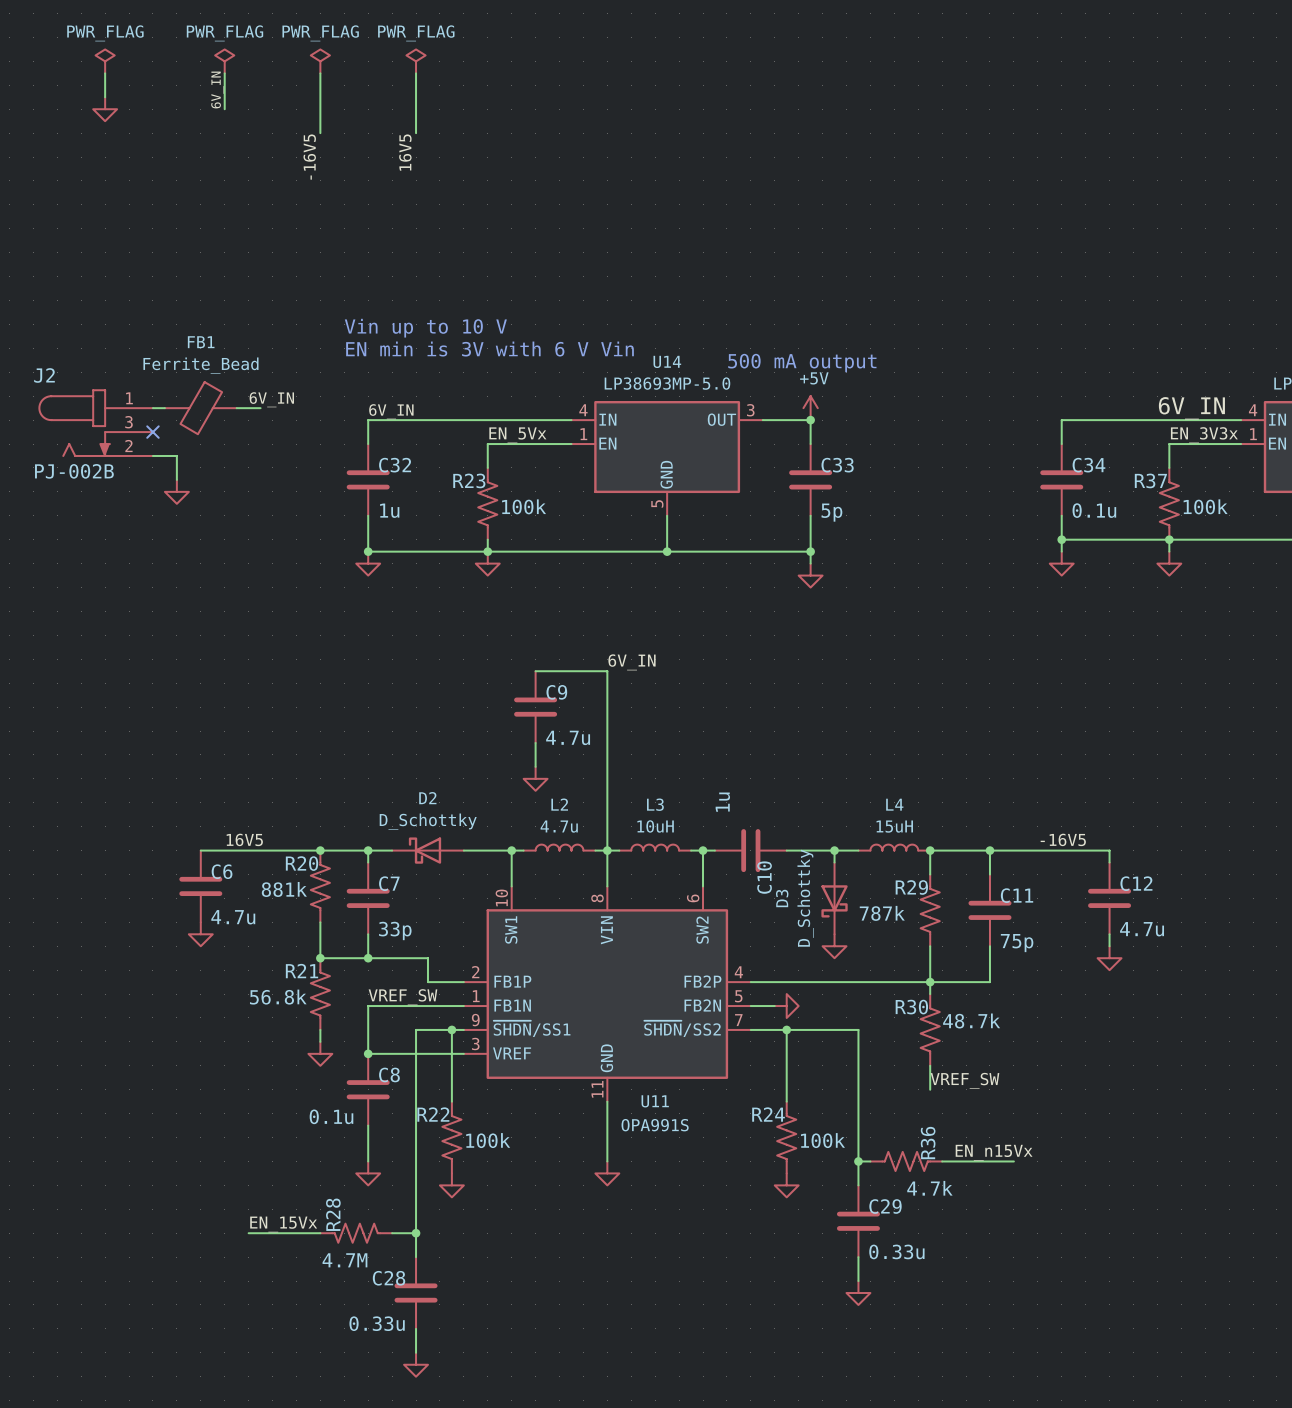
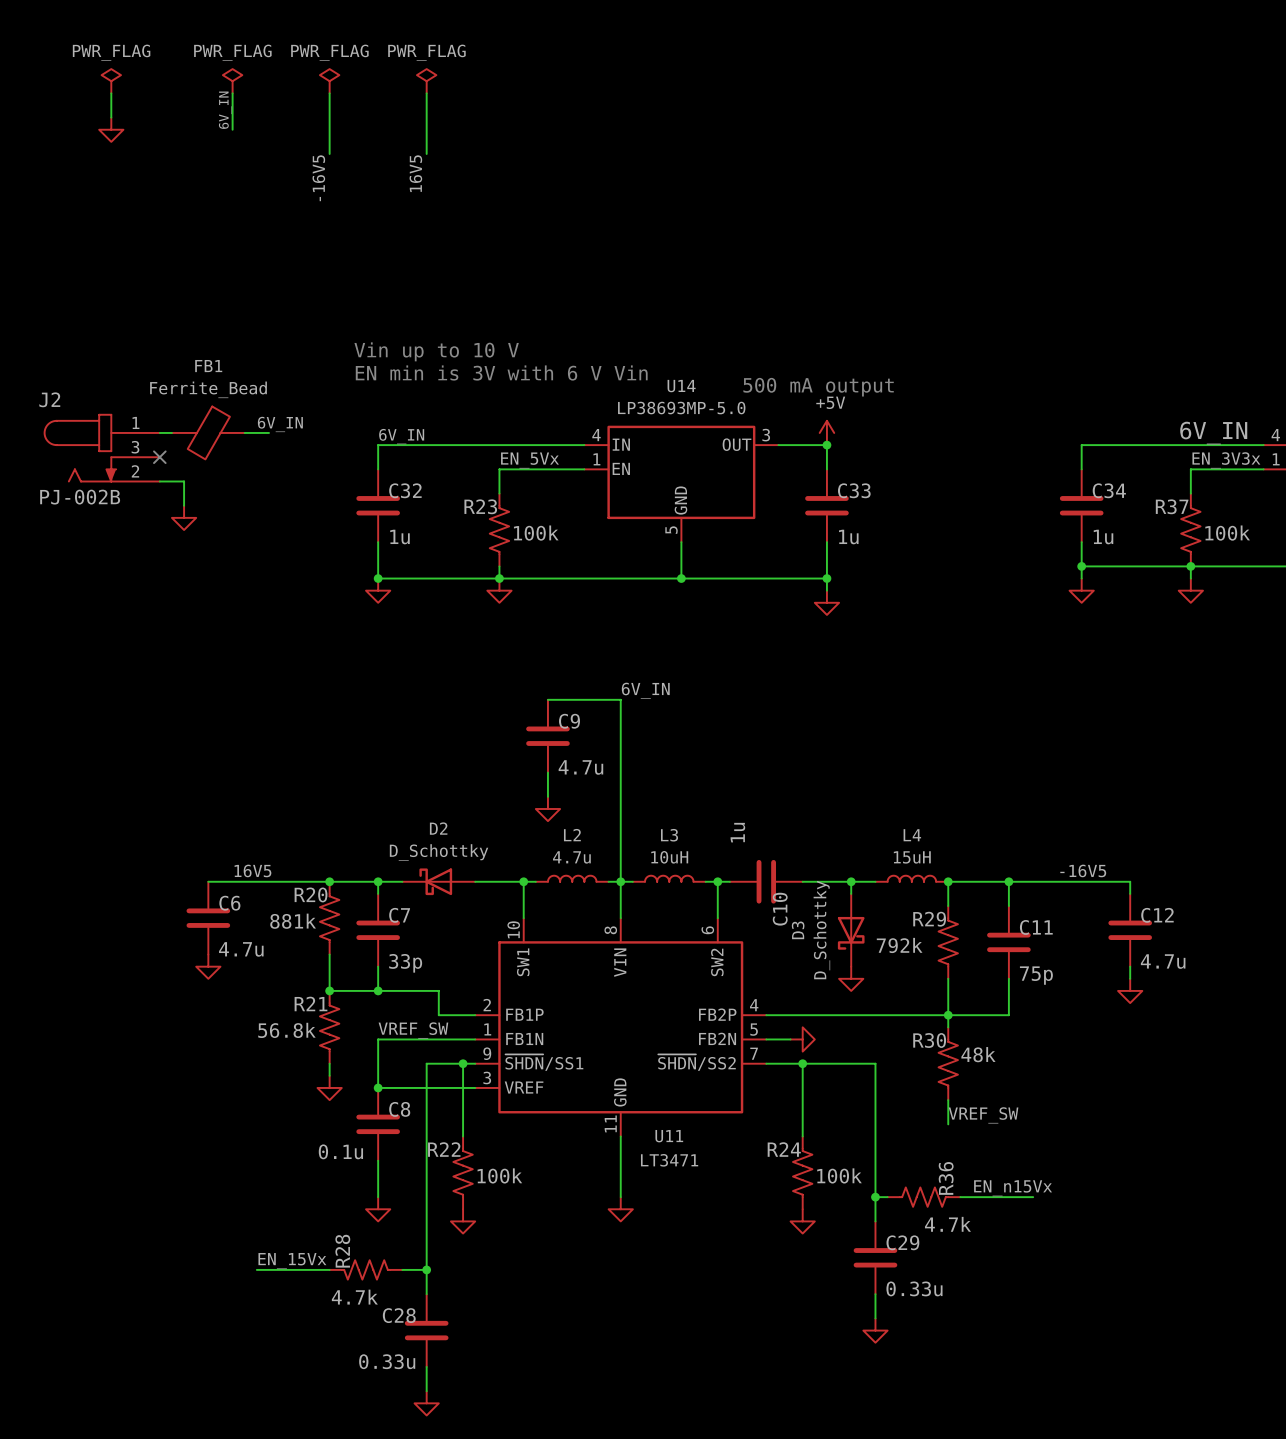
C34 value: 0.1u (1094, 510) -> 1u (1103, 537)
C33 value: 5p (831, 512) -> 1u (848, 537)
R29 value: 787k (882, 913) -> 792k (899, 945)
R30 value: 48.7k (971, 1021) -> 48k (978, 1054)
U11 value: OPA991S (655, 1125) -> LT3471 (669, 1160)
R28 value: 4.7M (344, 1260) -> 4.7k (354, 1297)

